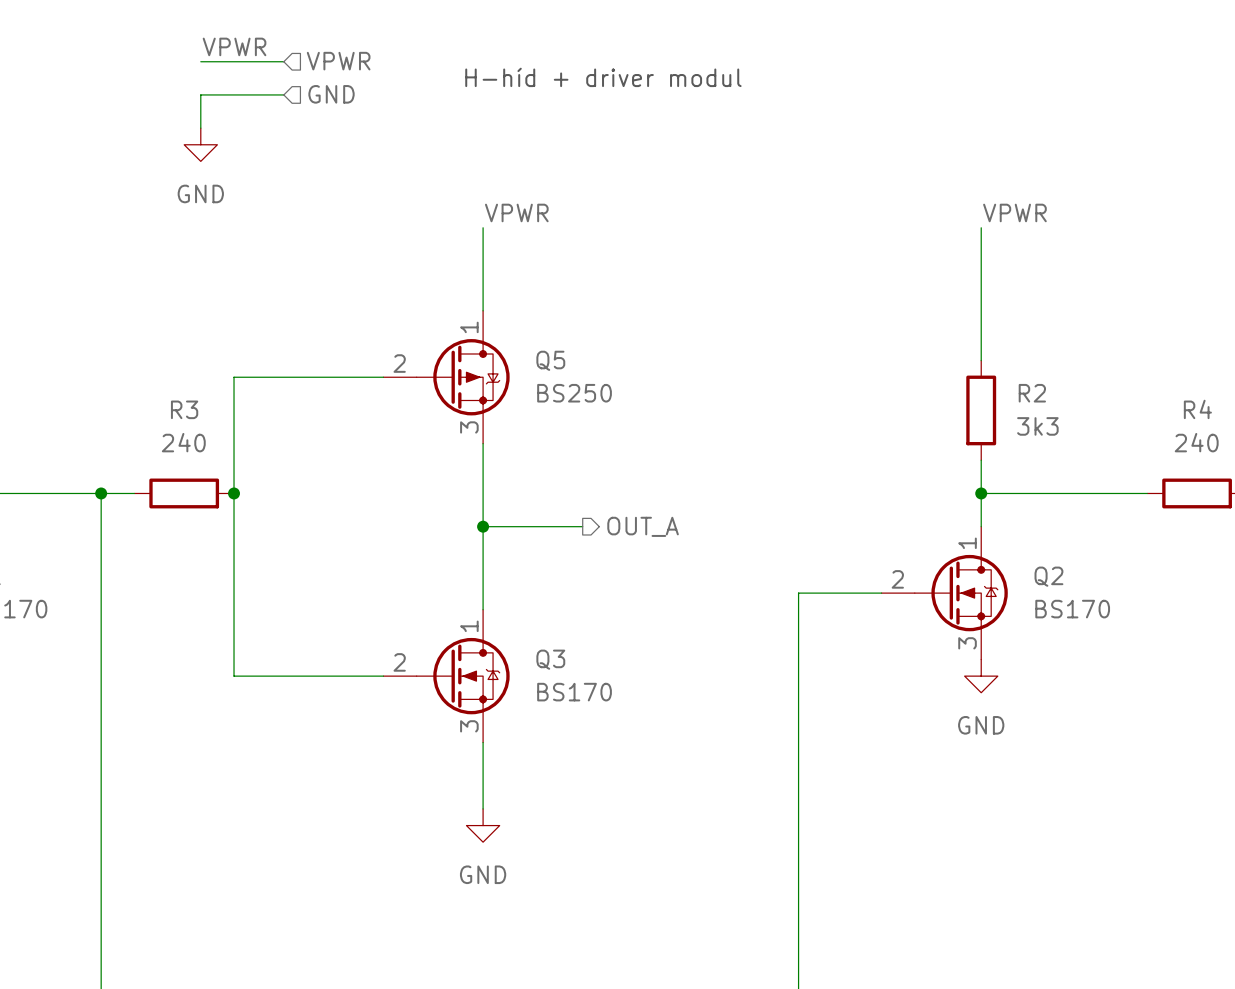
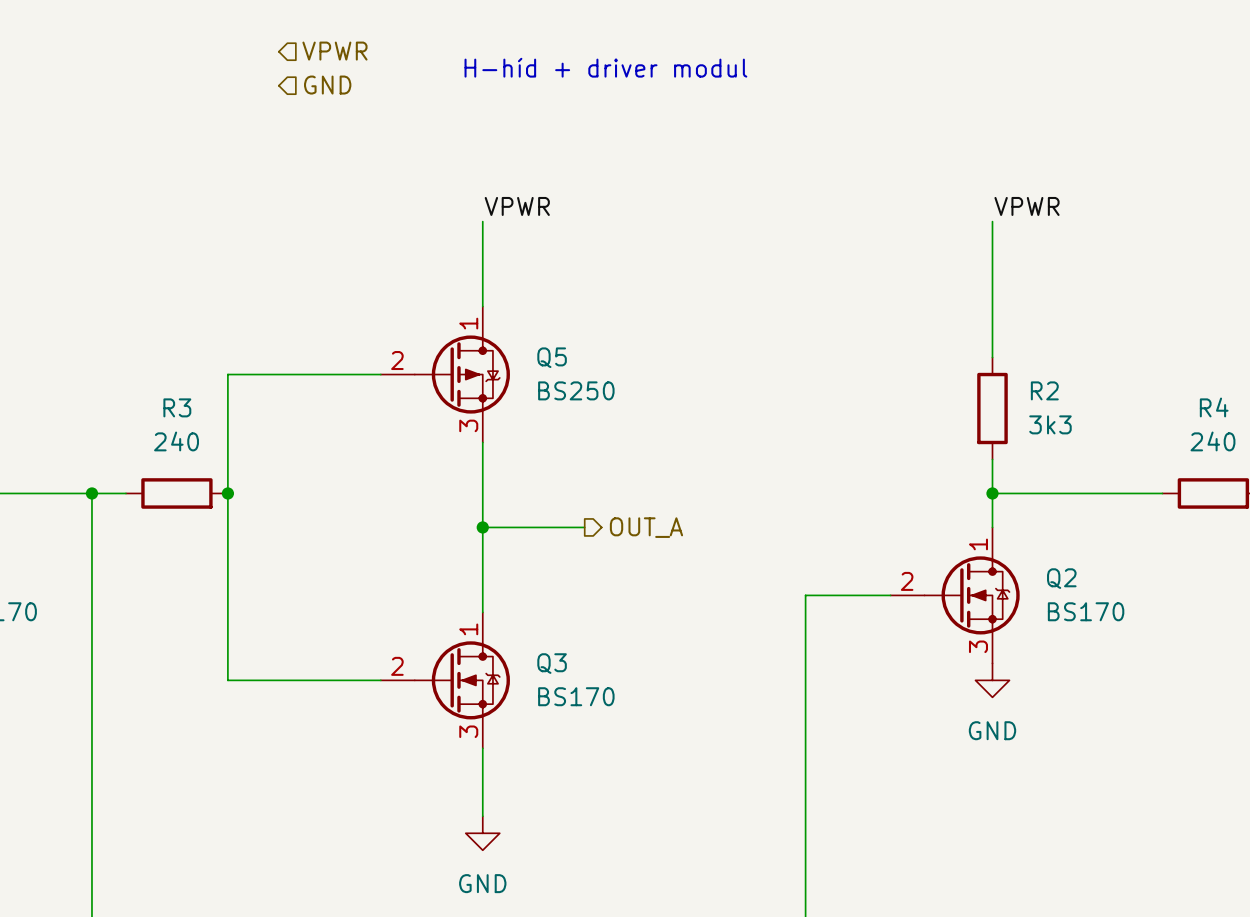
label: VPWR (234, 46) -> none
wire: (200, 61) (283, 61) -> none
wire: (283, 94) (200, 94) (200, 128) -> none
power symbol: GND (200, 144) -> none

